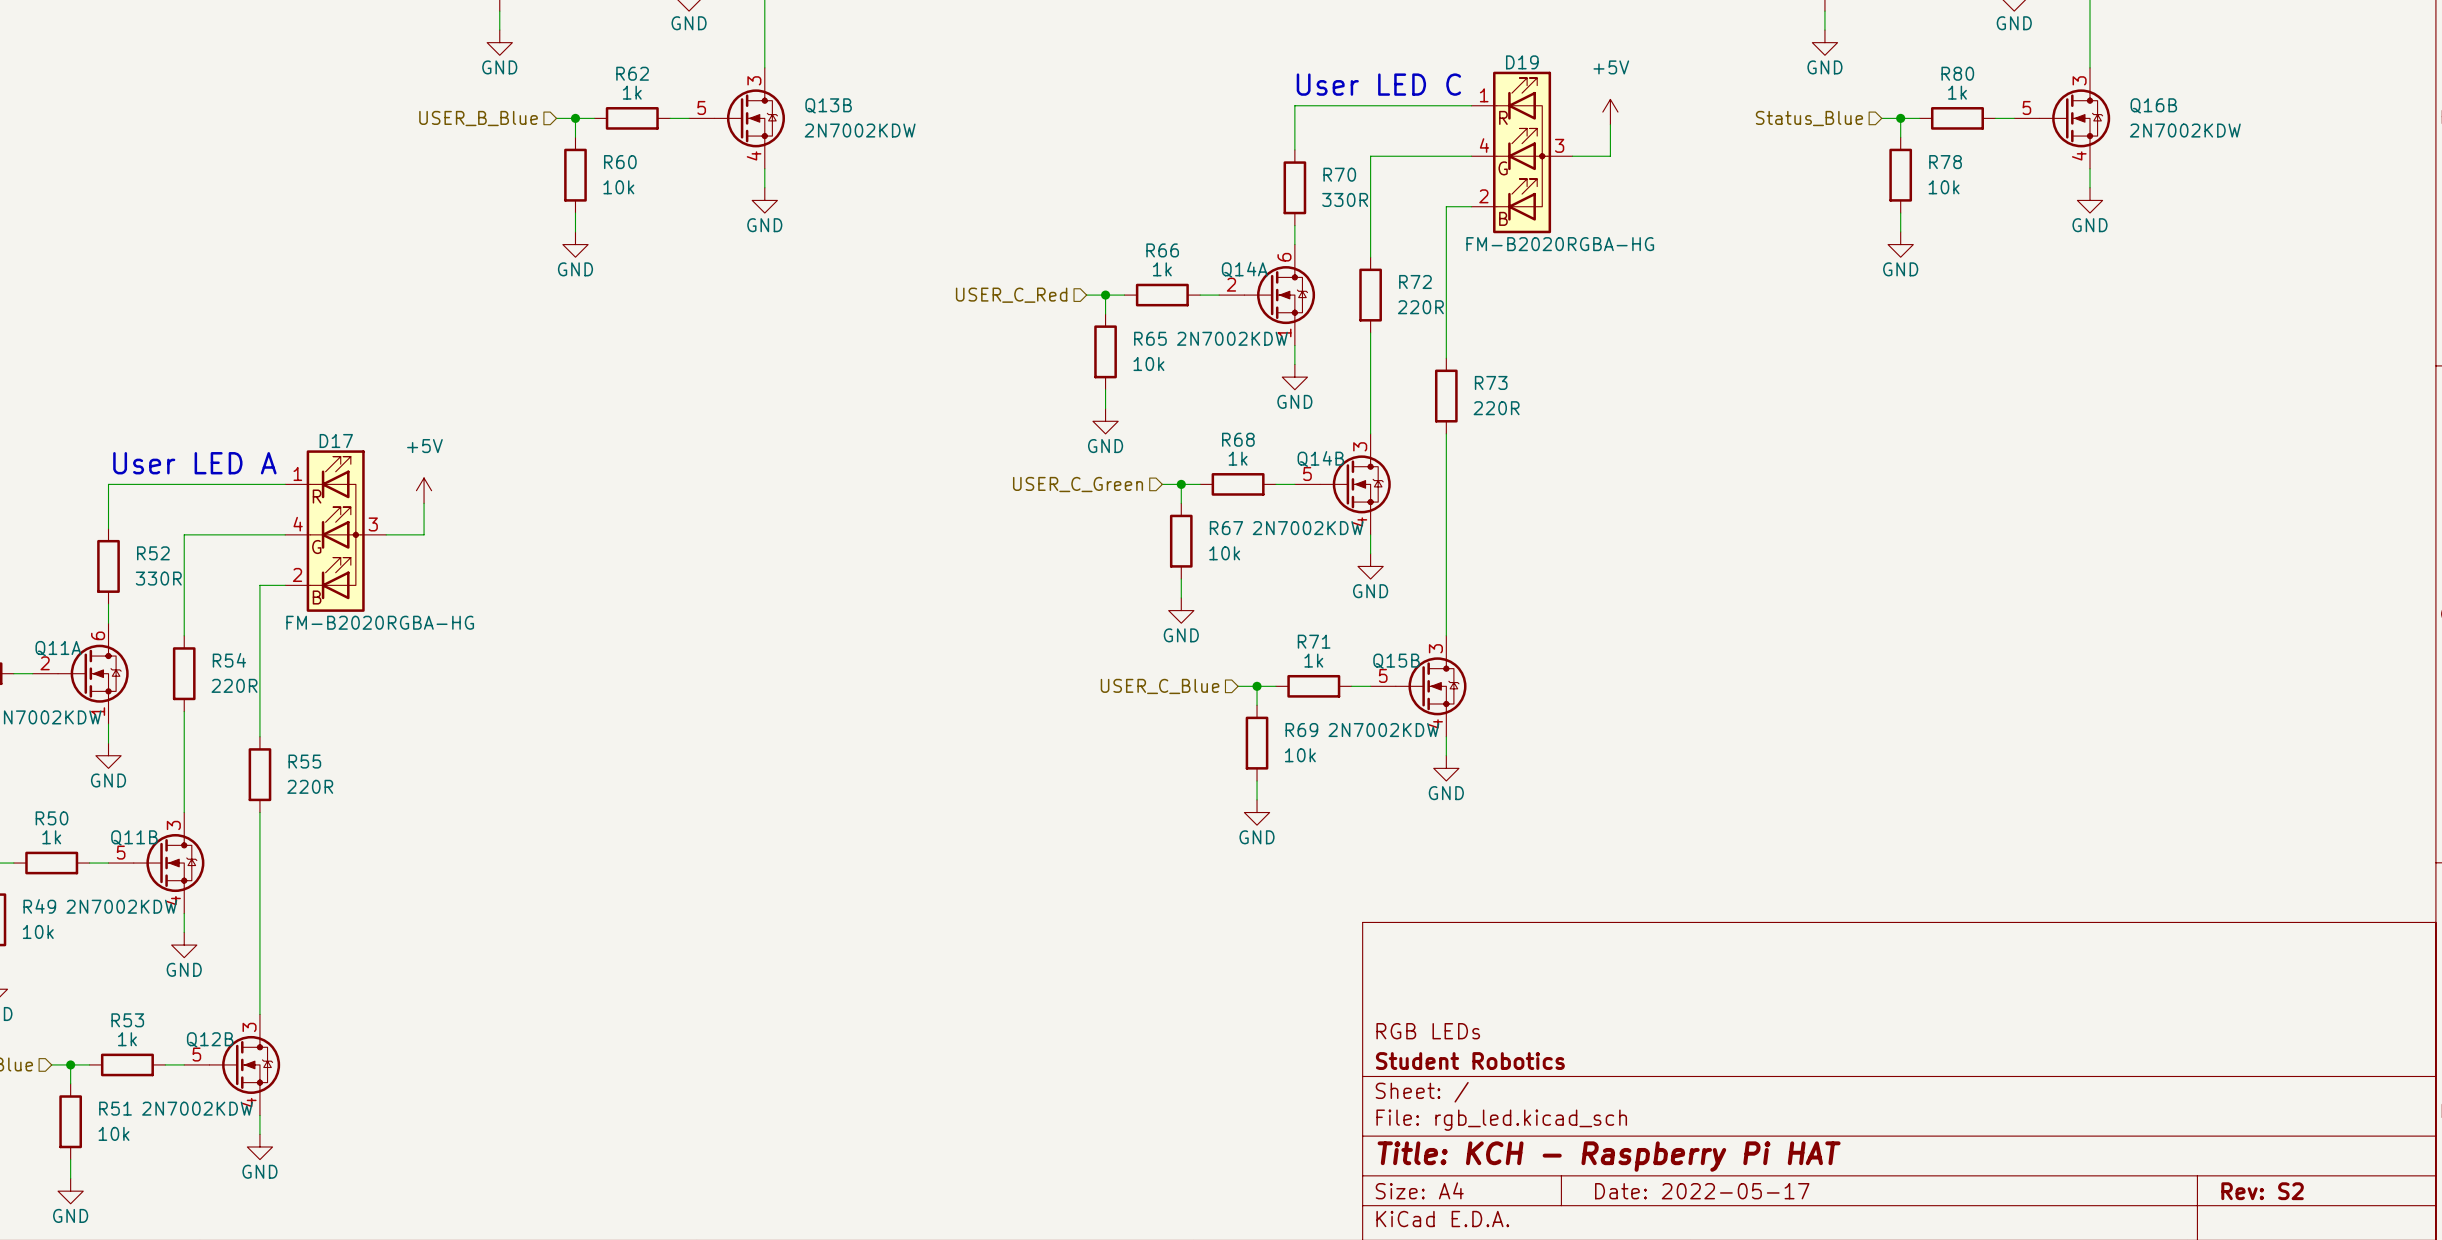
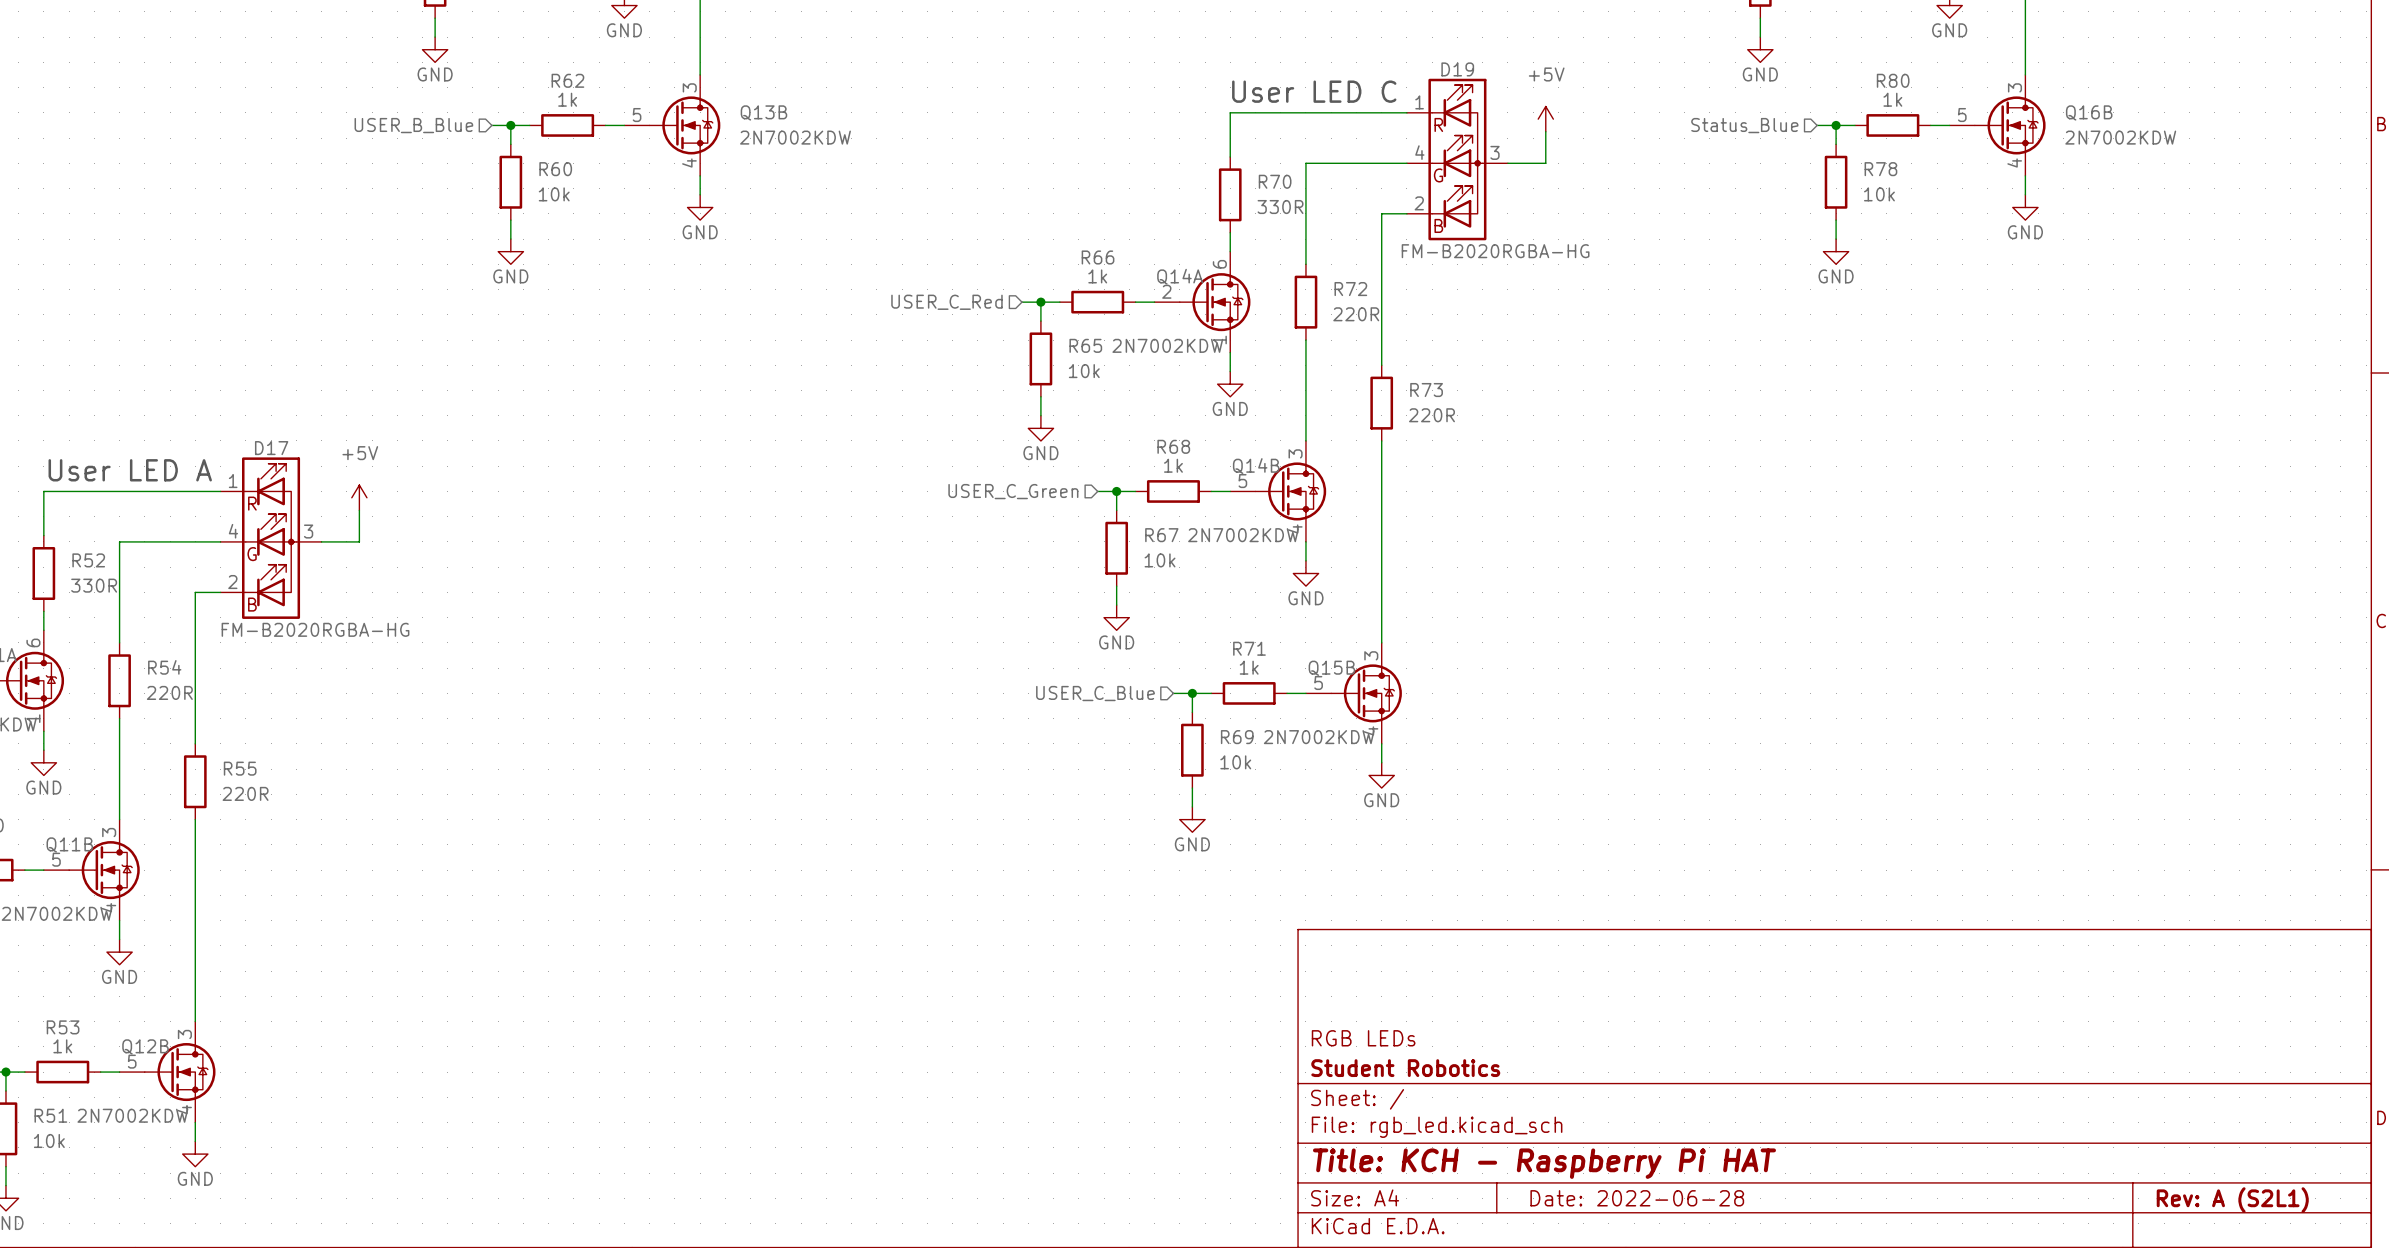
title block: Date: 2022-05-17 (1702, 1191) -> Date: 2022-06-28 (1637, 1198)
title block: Rev: S2 (2262, 1191) -> Rev: A (S2L1) (2232, 1200)

